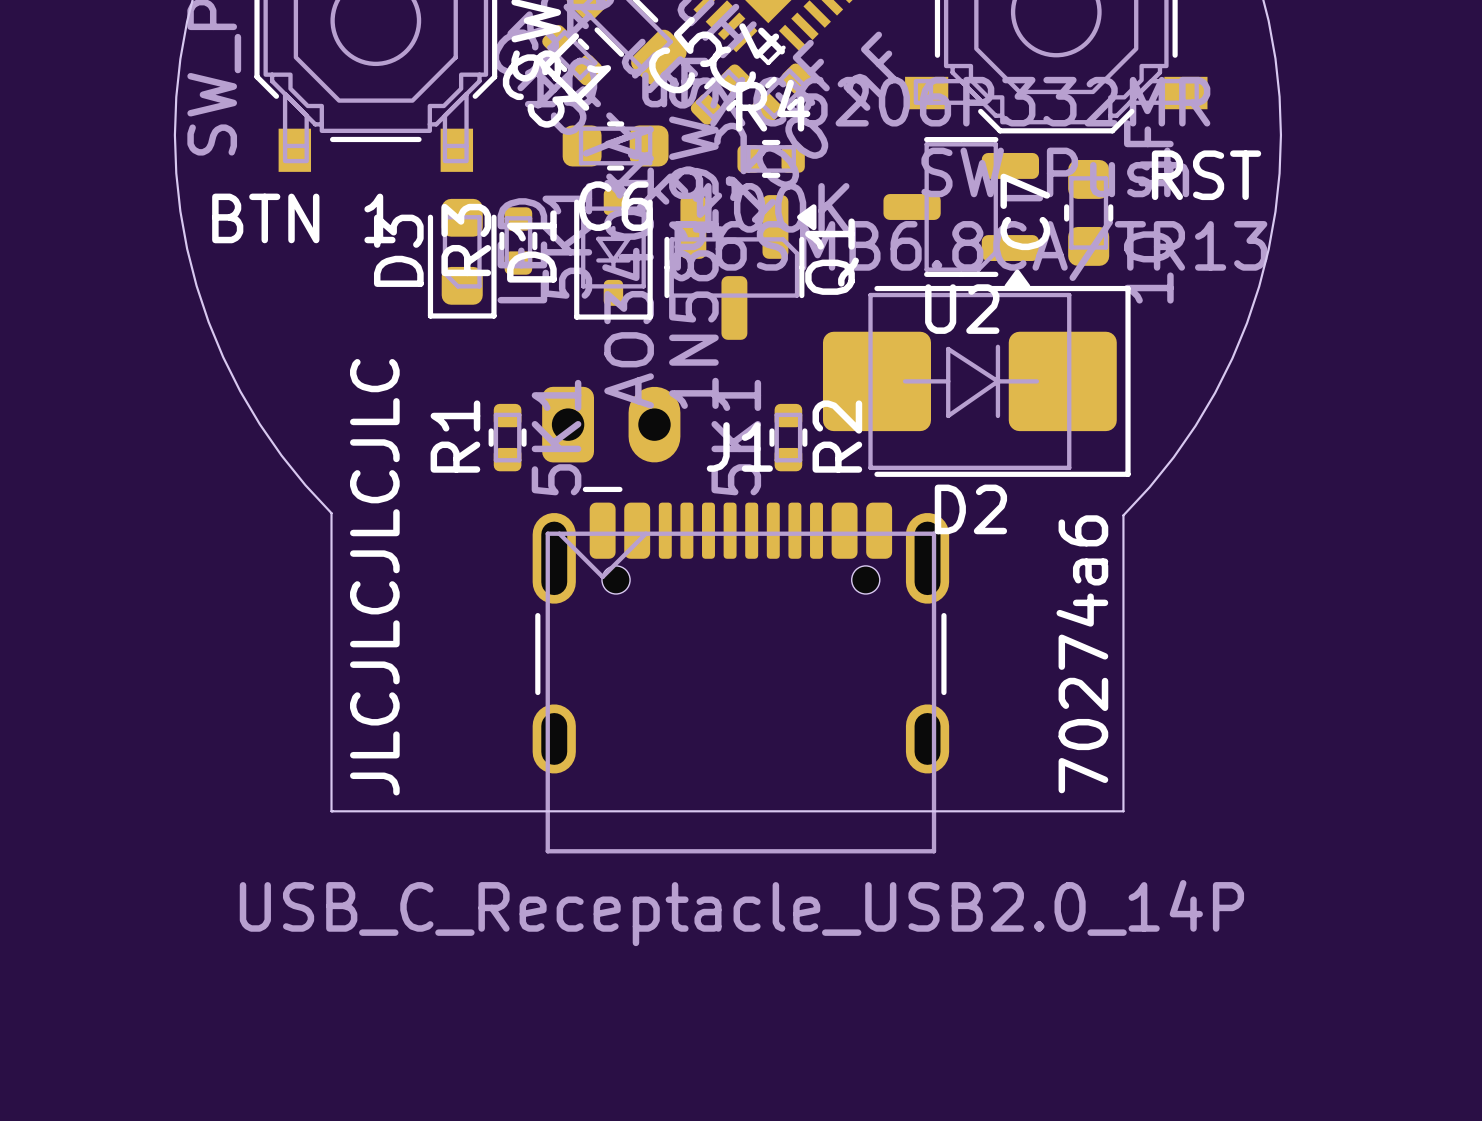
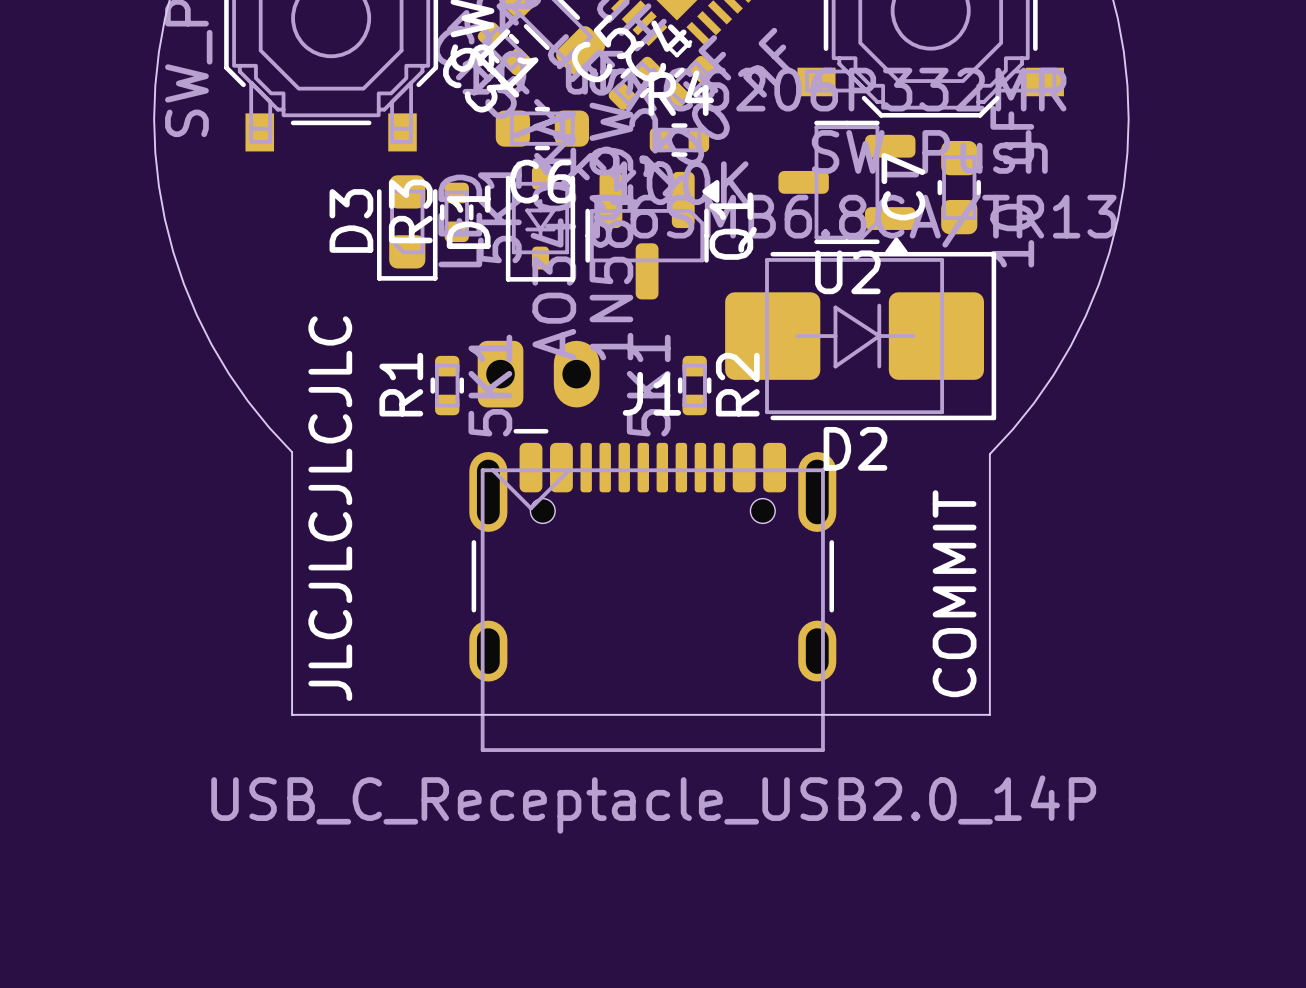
text: RST (1206, 175) -> none
text: BTN 1 (303, 218) -> none
text: 70274a6 (1082, 654) -> COMMIT (954, 593)

